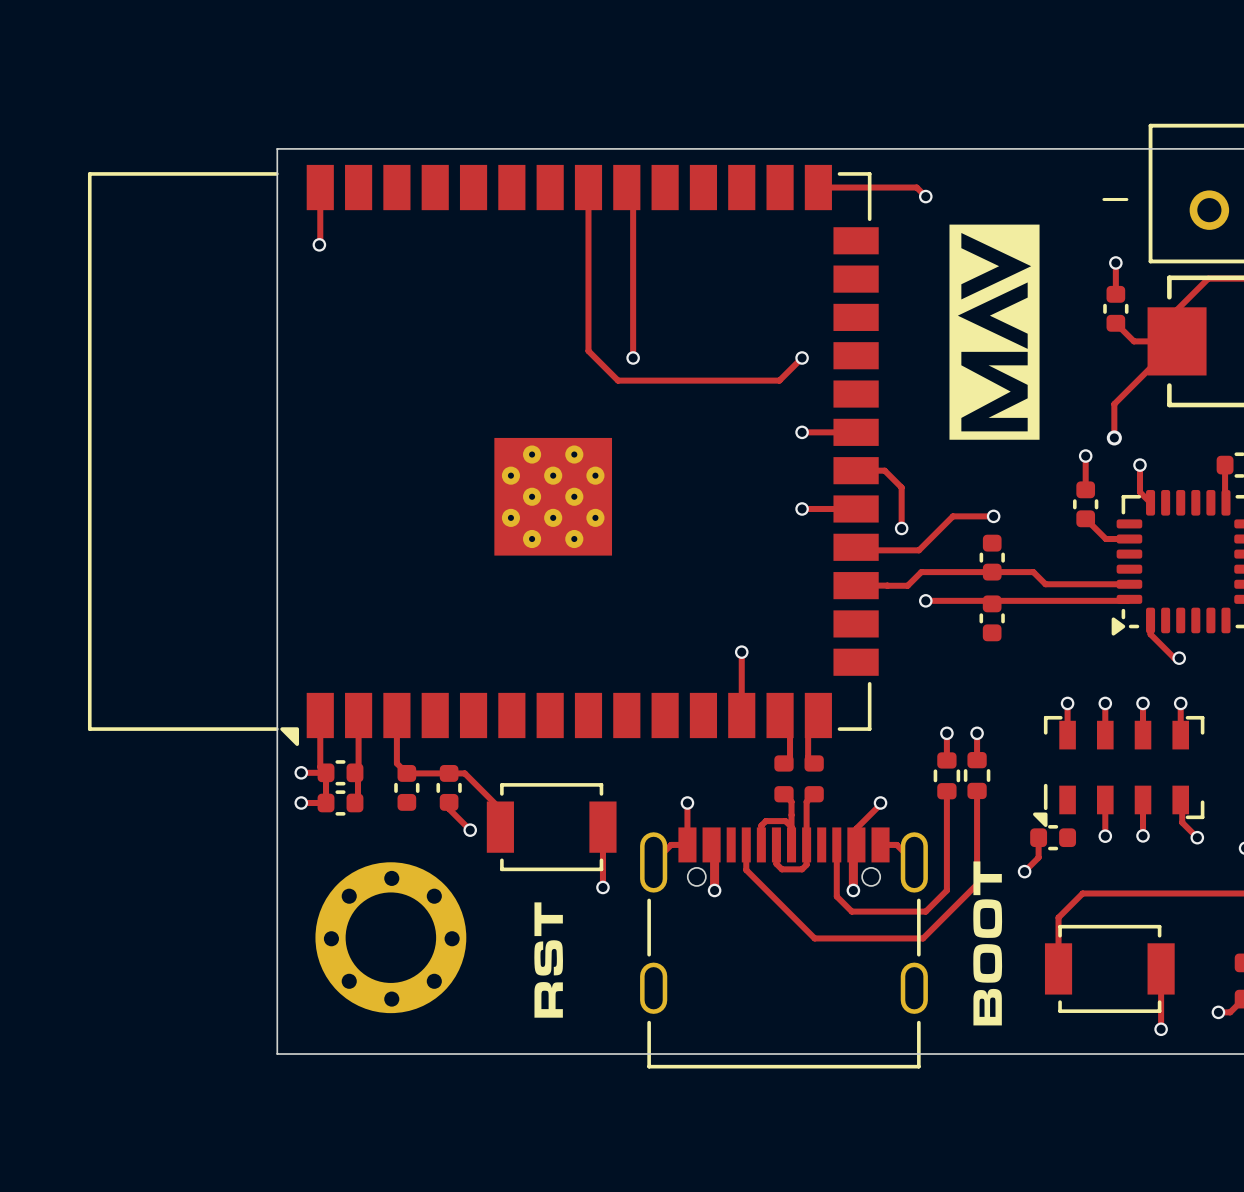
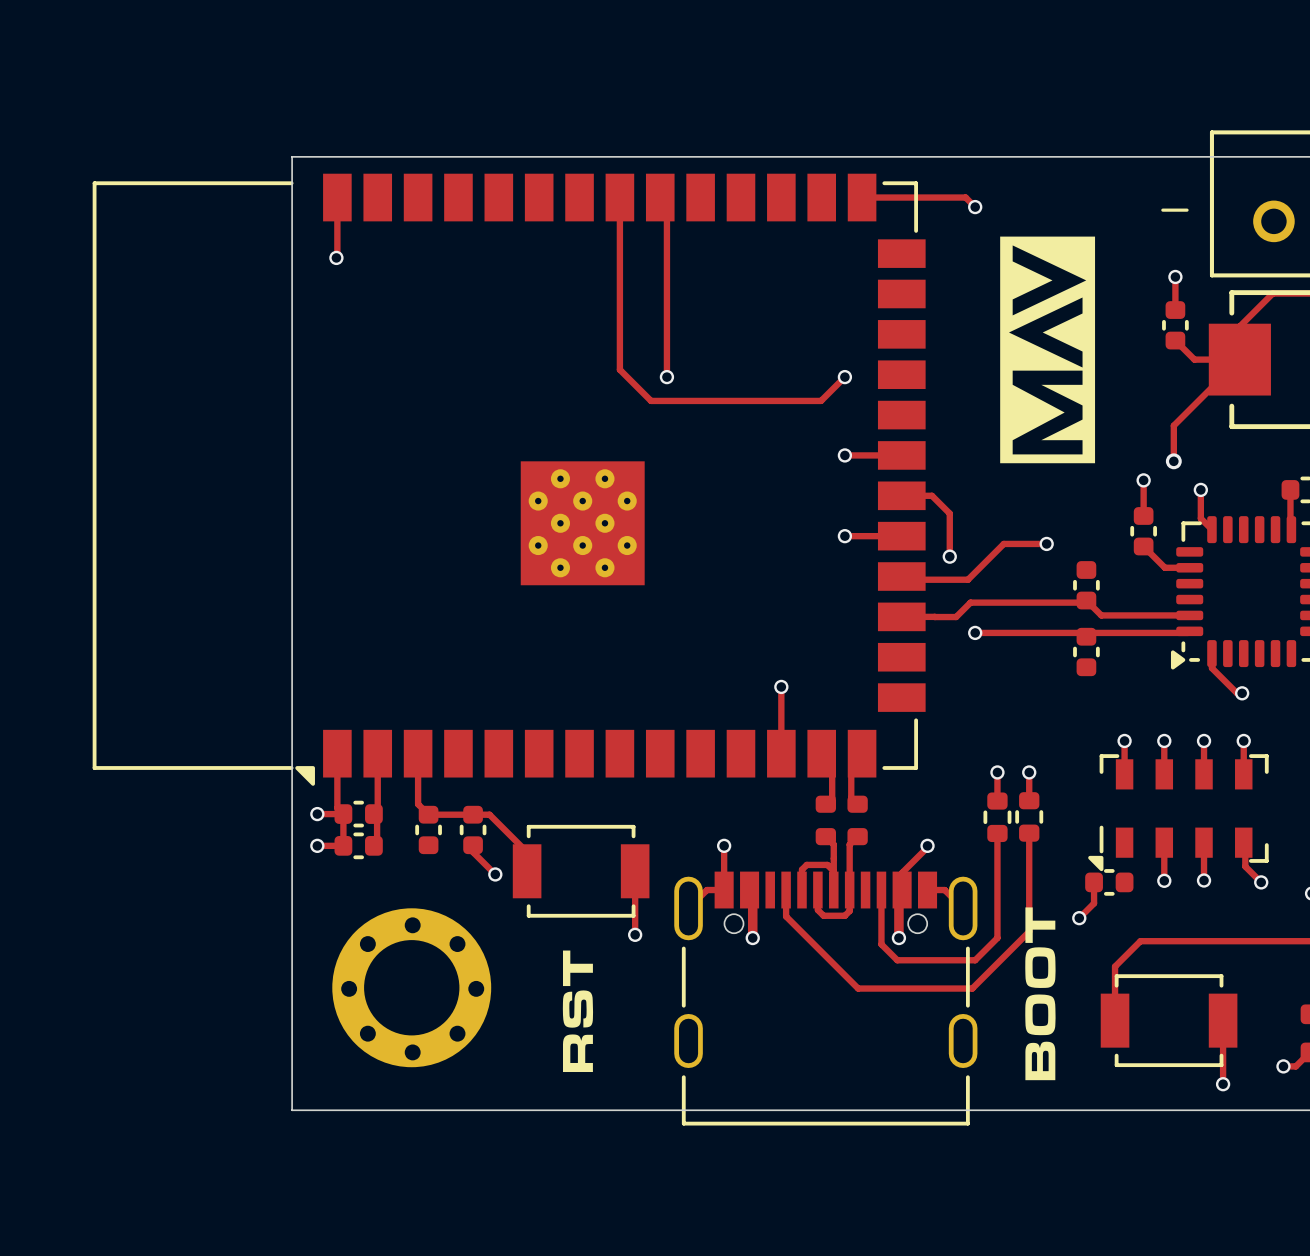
part: none -> (1086, 585)
part: (992, 557) -> none
part: (992, 618) -> none
part: none -> (1086, 651)

